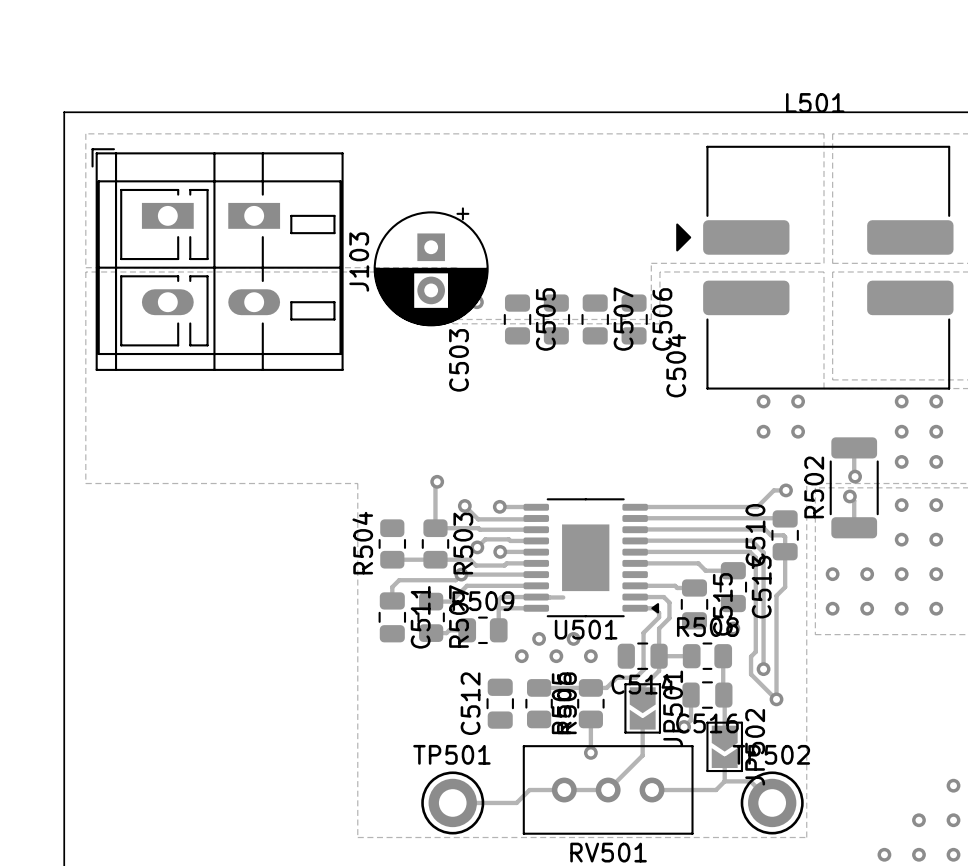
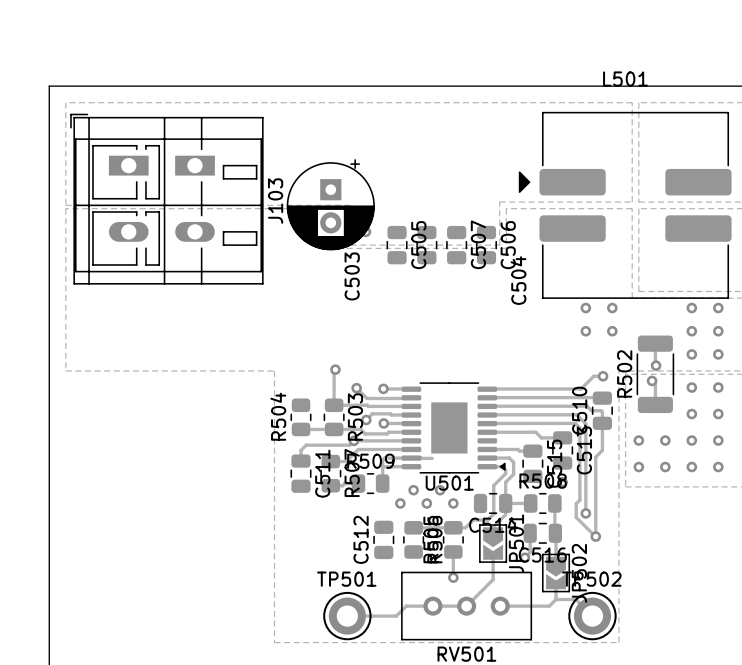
via: (953, 785) -> none
via: (918, 820) -> none
via: (953, 820) -> none
via: (884, 854) -> none
via: (918, 854) -> none
via: (953, 854) -> none

